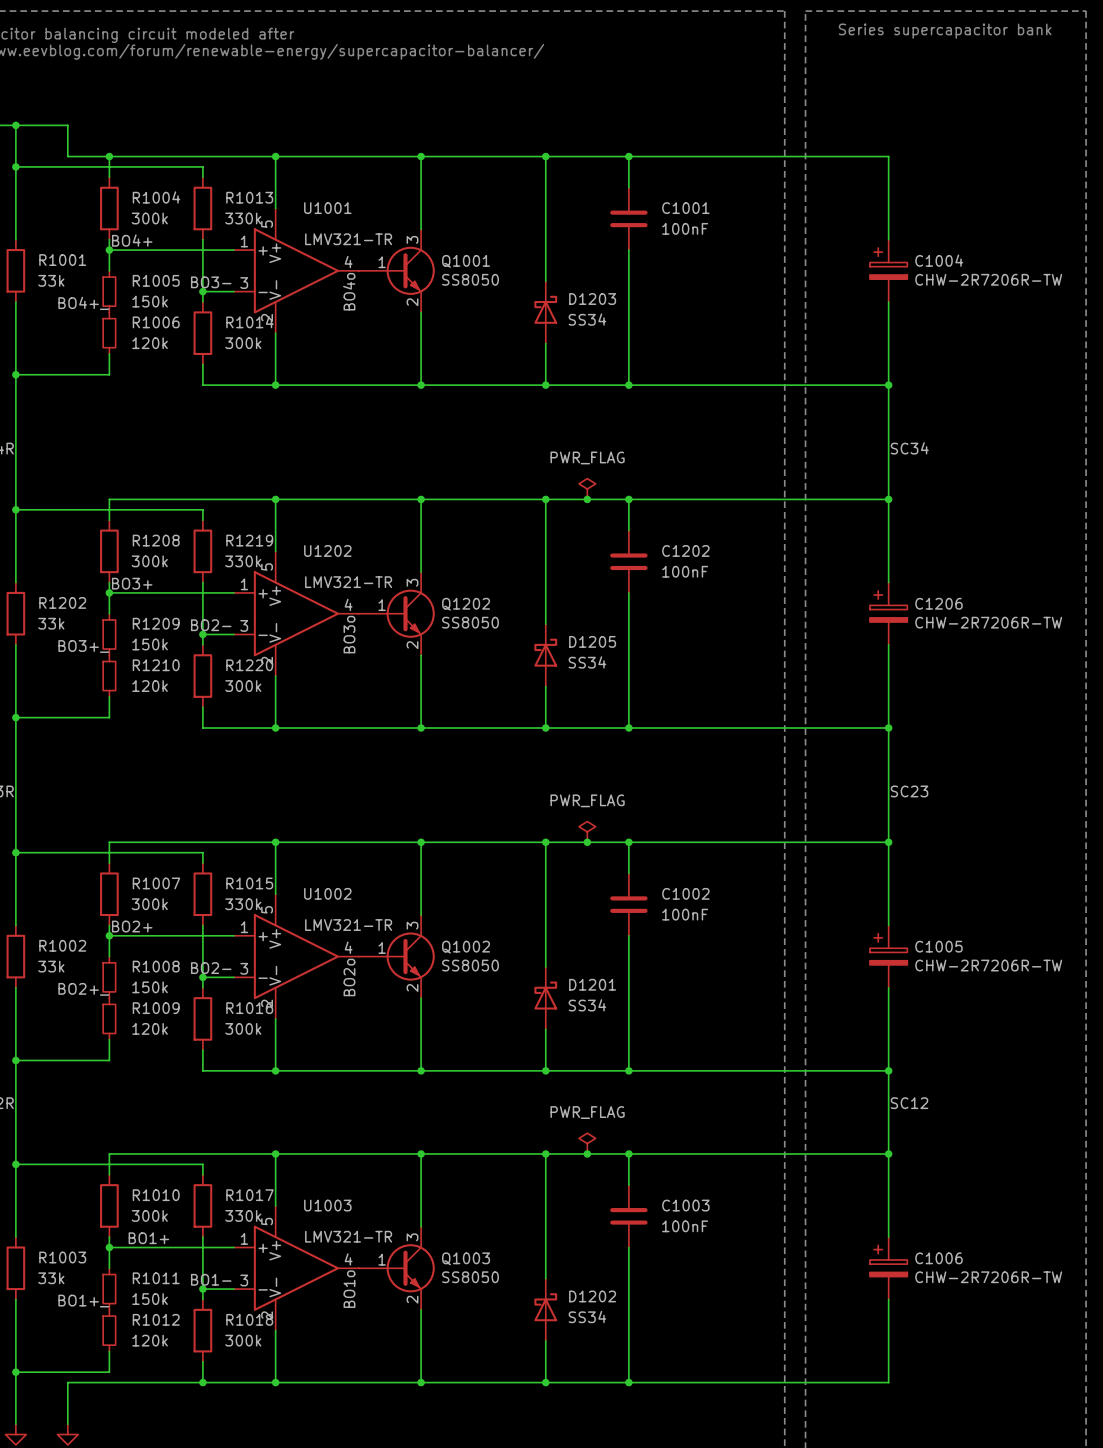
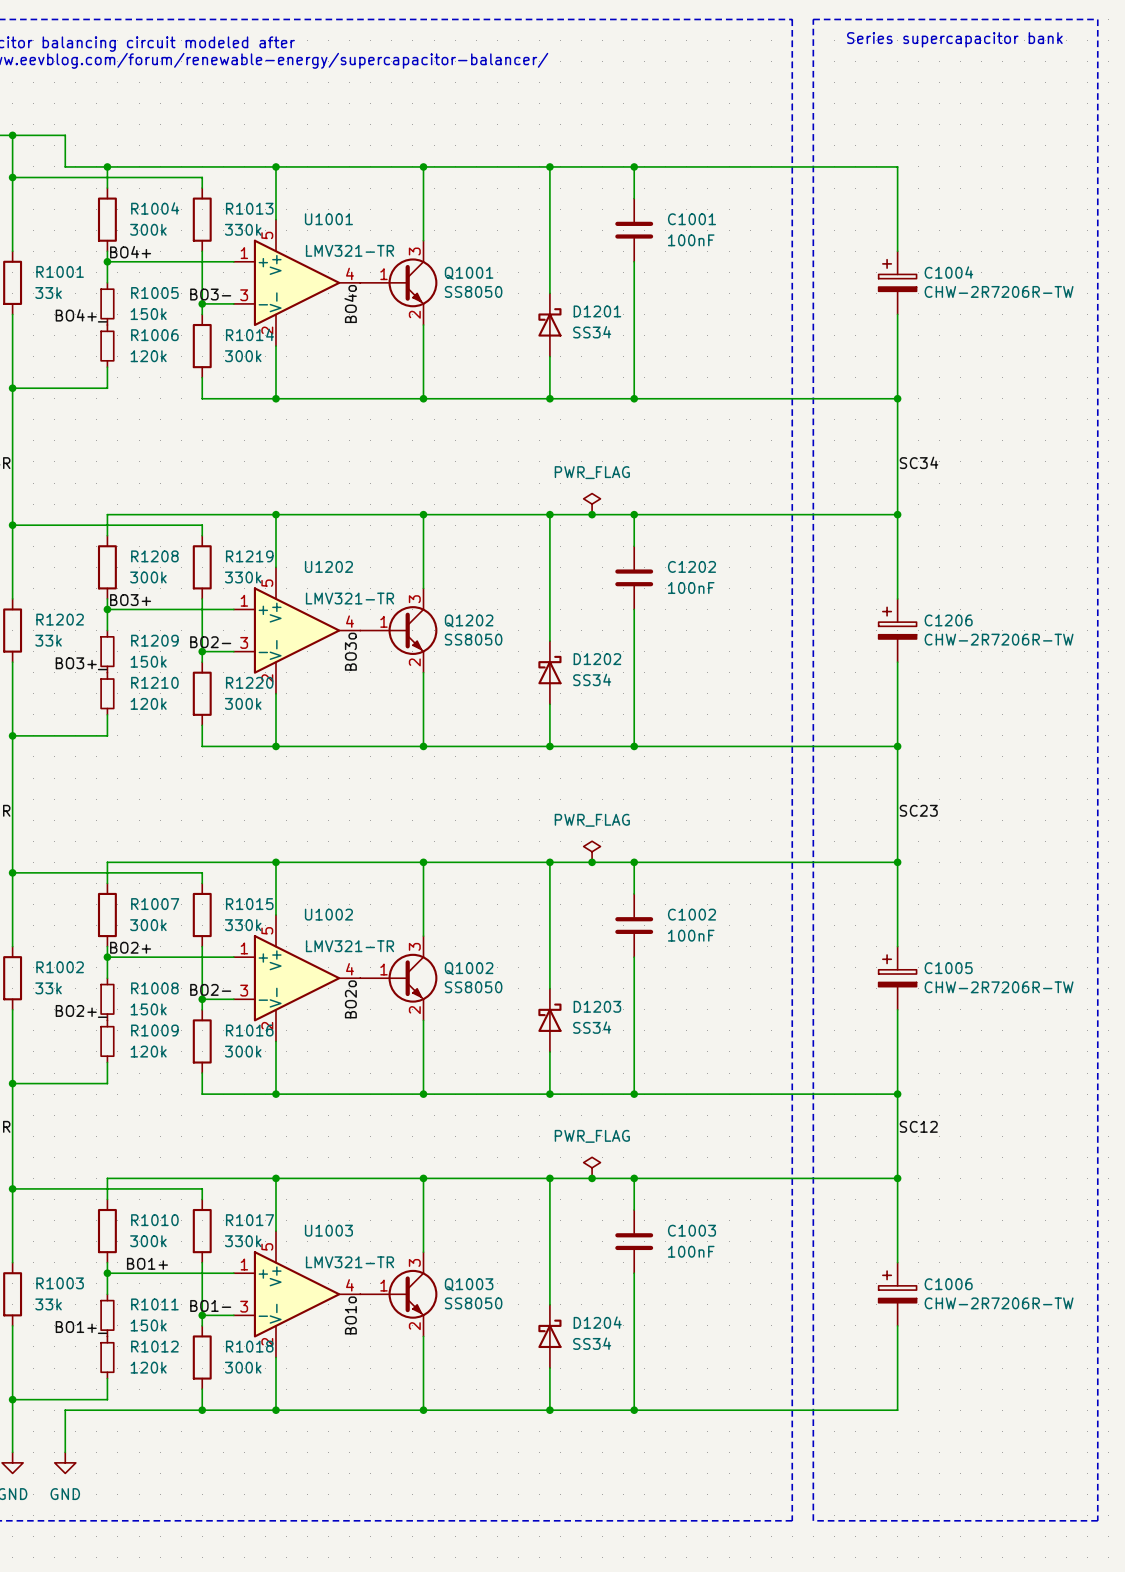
D1203 name: D1203 (592, 299) -> D1201 (597, 311)
D1205 name: D1205 (592, 641) -> D1202 (597, 659)
D1201 name: D1201 (592, 984) -> D1203 (597, 1006)
D1202 name: D1202 (592, 1296) -> D1204 (597, 1322)

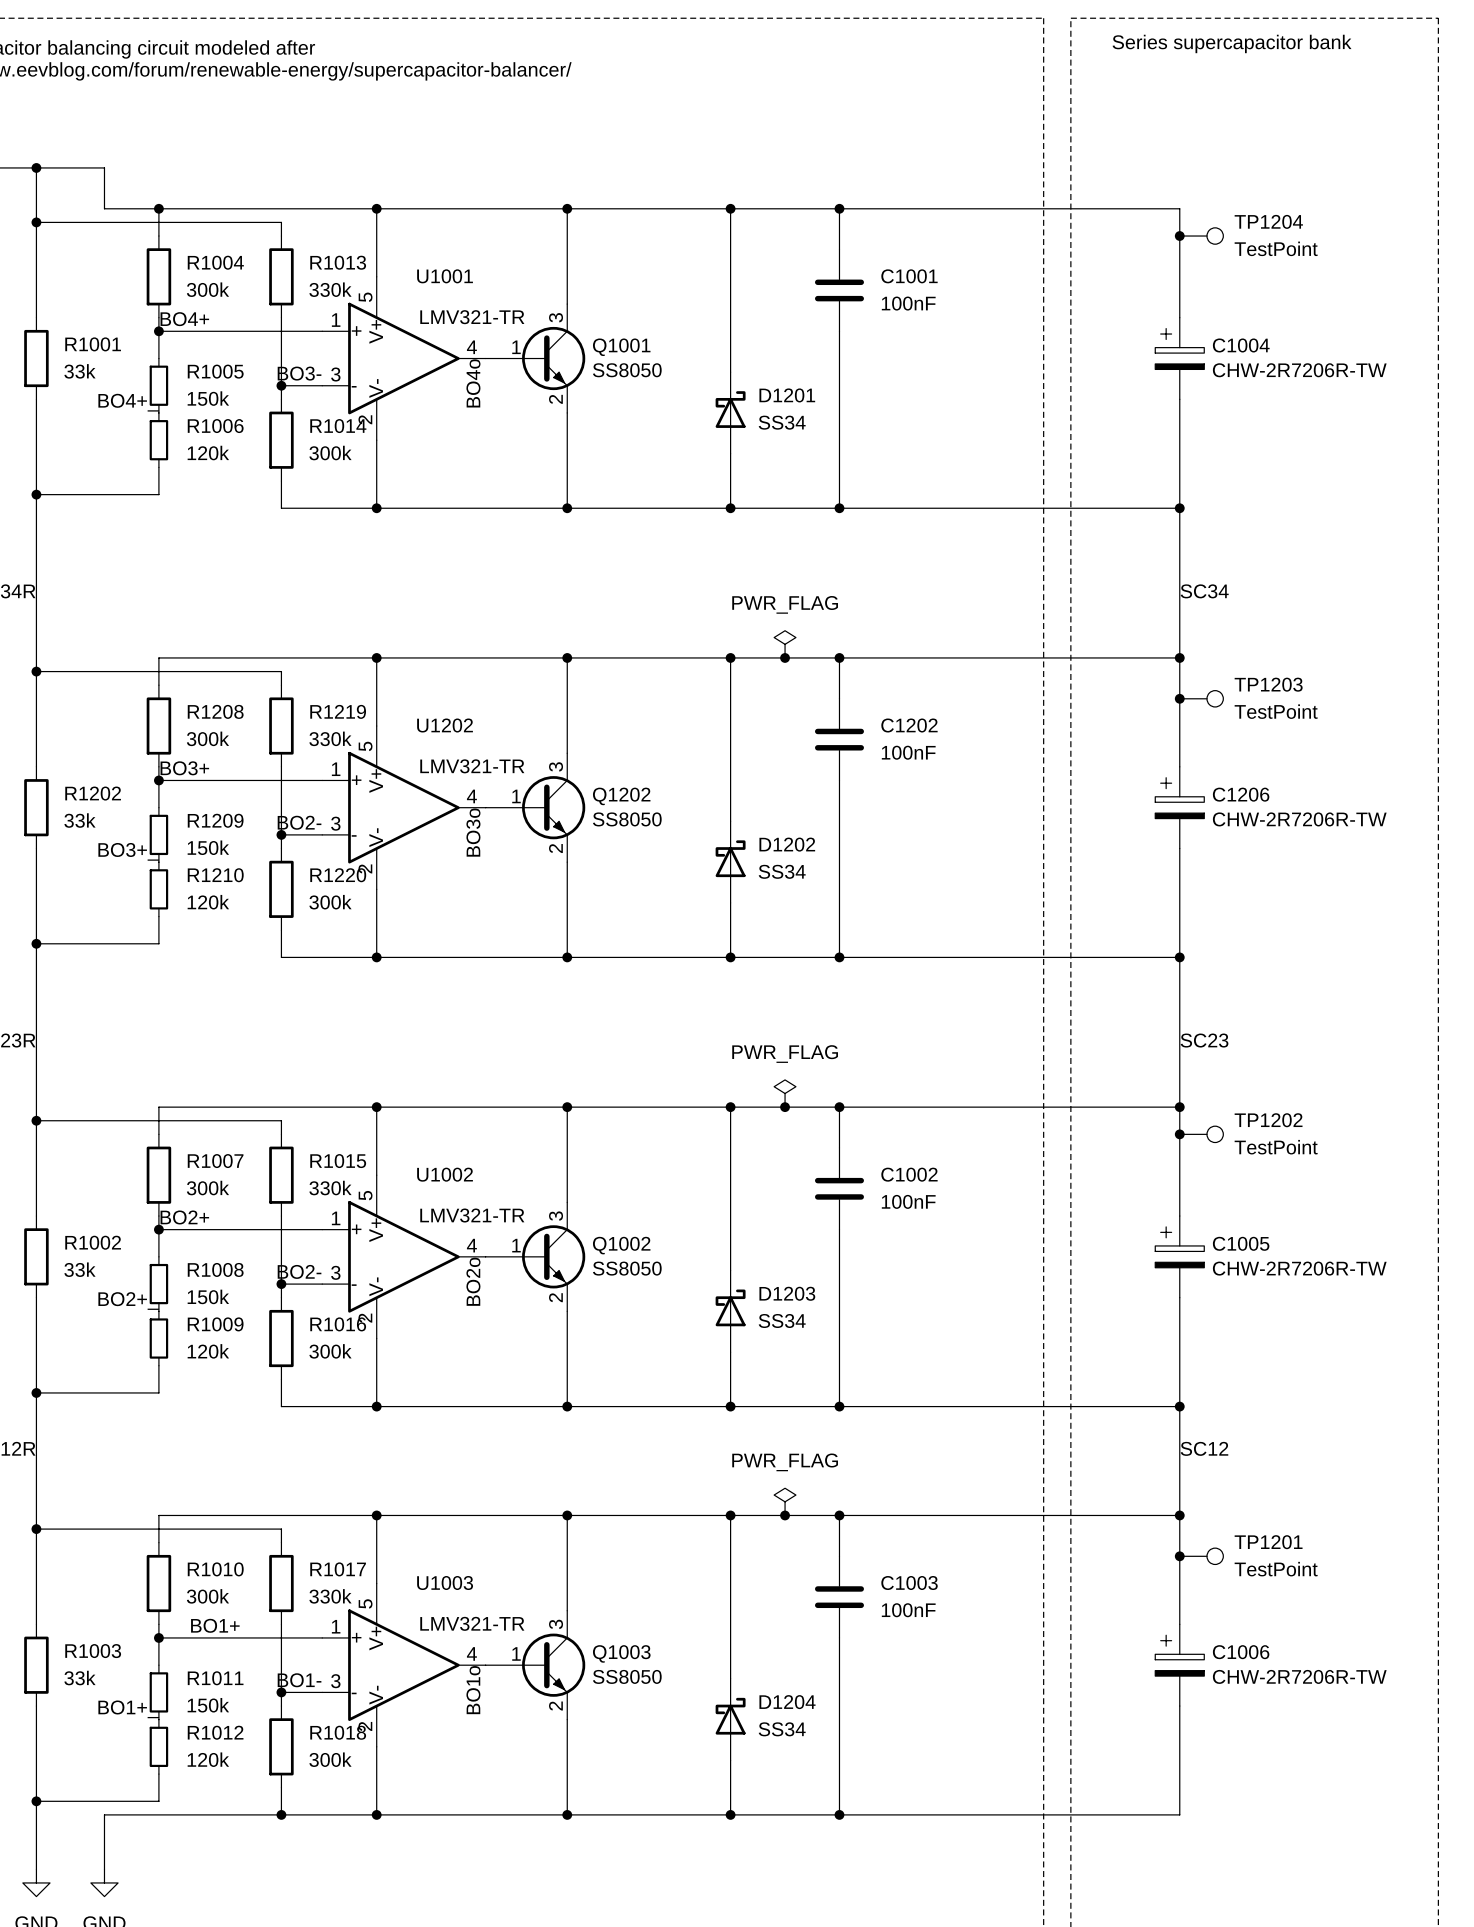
junction: none -> (1179, 236)
TP1204: none -> TestPoint (1201, 236)
junction: none -> (1179, 698)
TP1203: none -> TestPoint (1201, 698)
junction: none -> (1179, 1134)
TP1202: none -> TestPoint (1201, 1134)
junction: none -> (1179, 1556)
TP1201: none -> TestPoint (1201, 1556)

